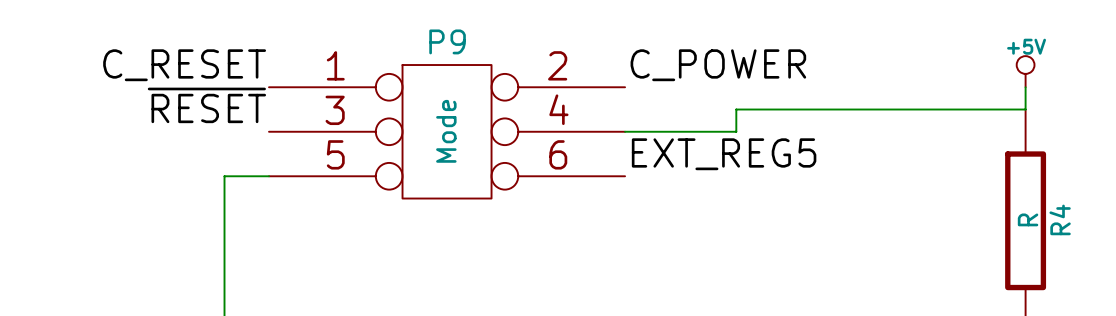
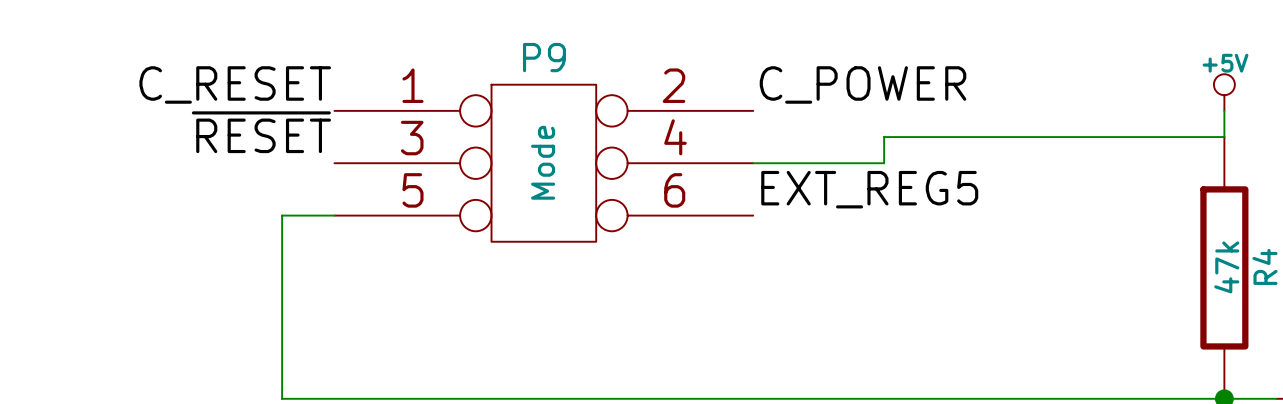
R4 value: R (1028, 219) -> 47k (1226, 267)

